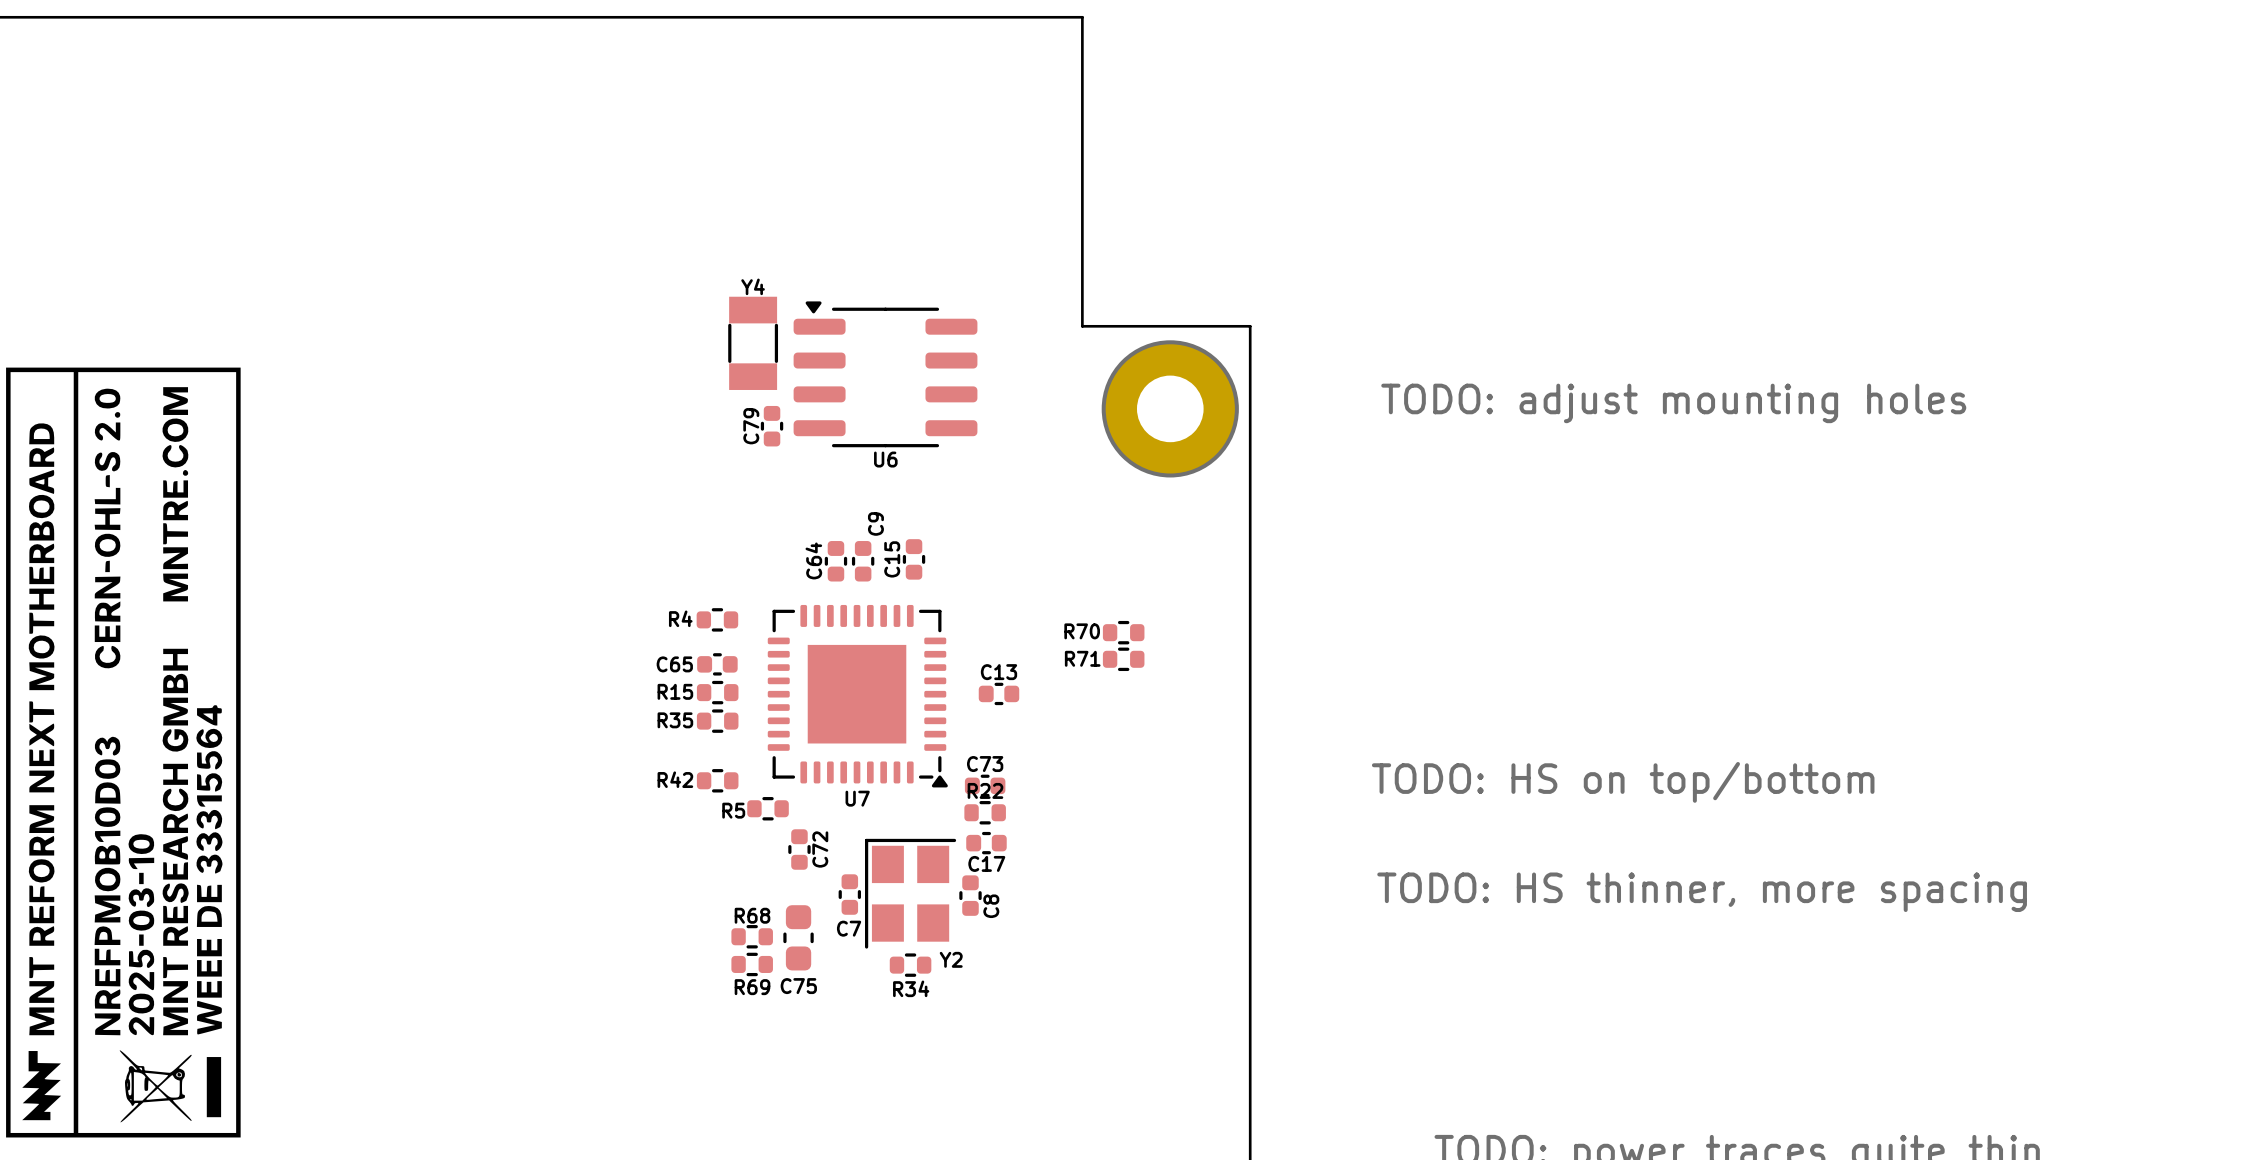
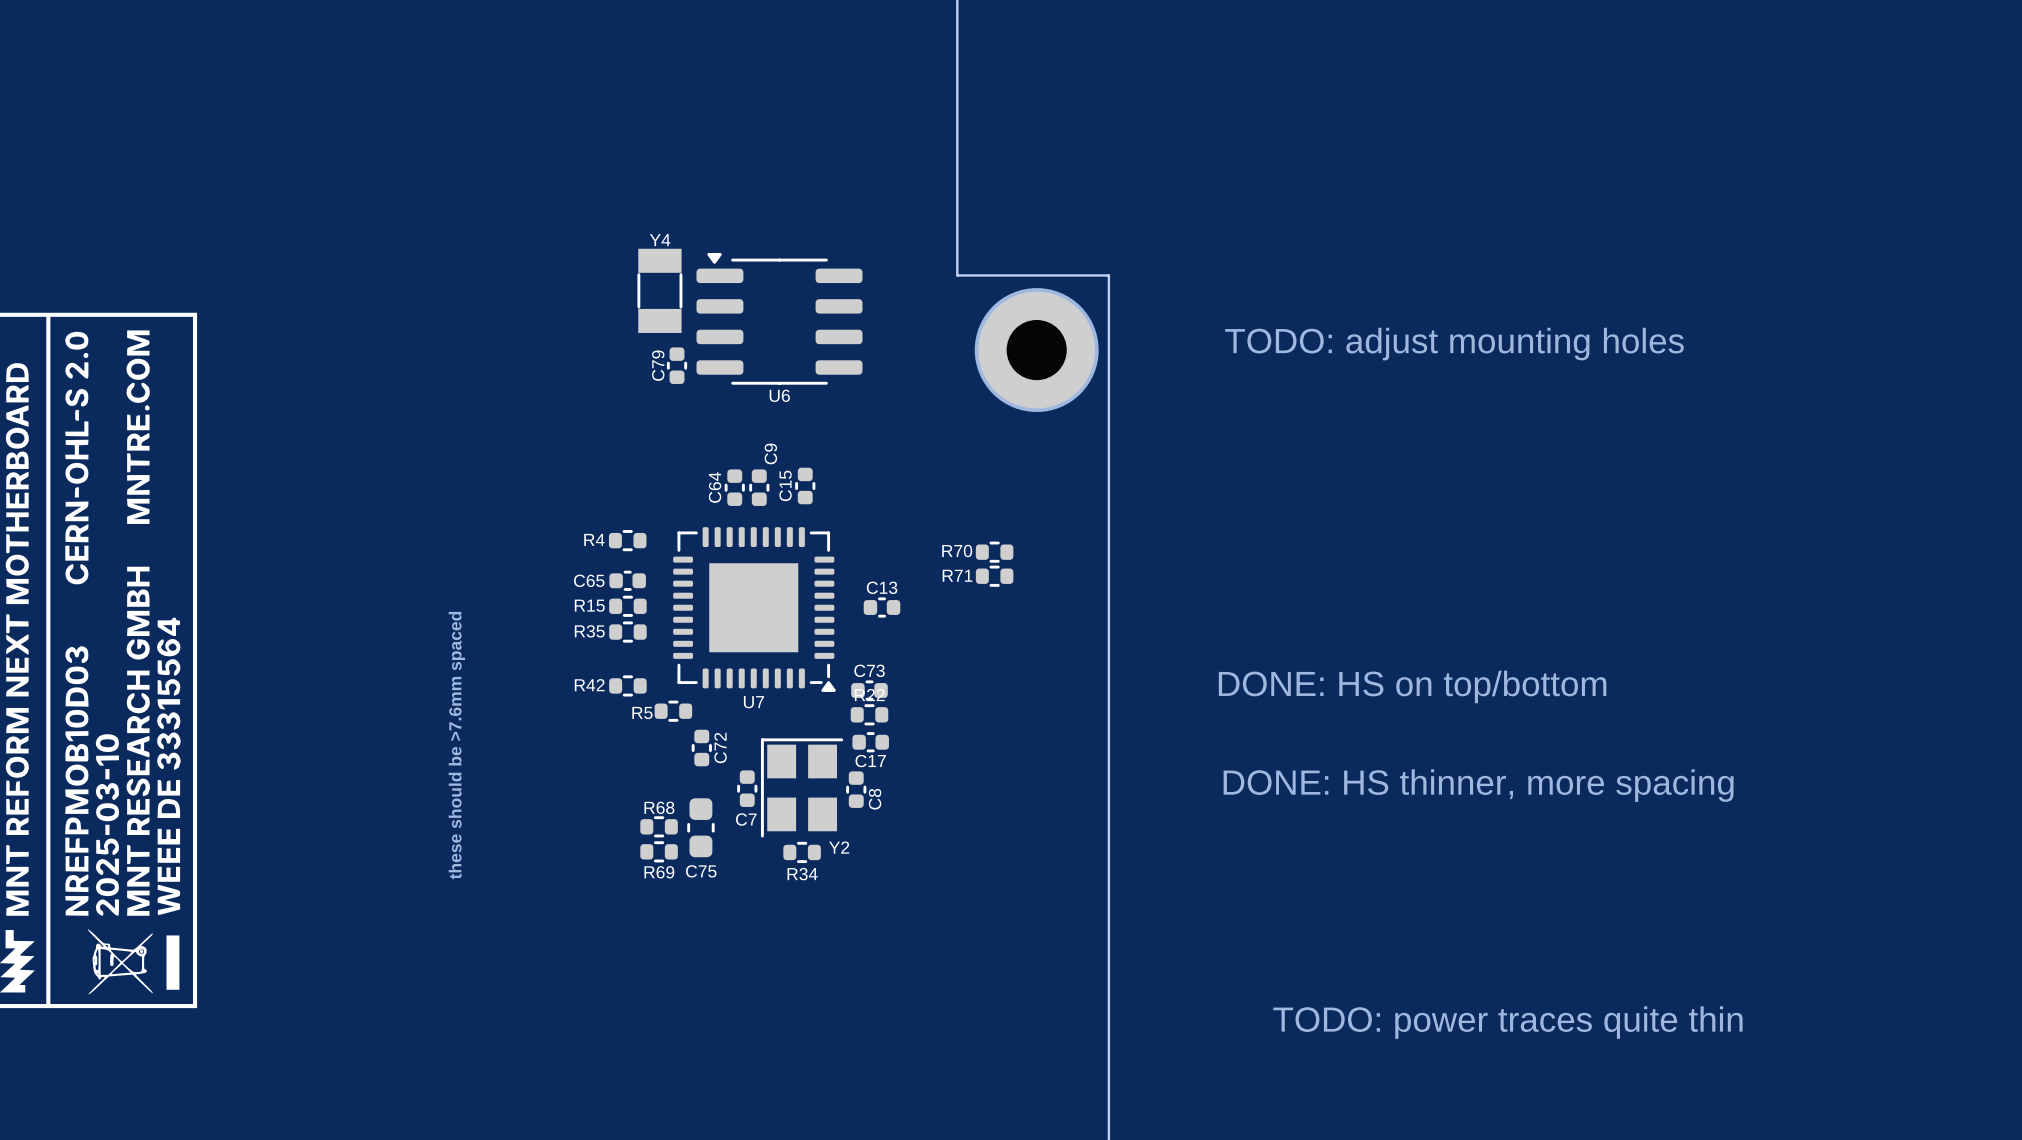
text: TODO: HS on top/bottom (1623, 782) -> DONE: HS on top/bottom (1412, 686)
text: none -> these should be >7.6mm spaced (456, 745)
text: TODO: HS thinner, more spacing (1702, 892) -> DONE: HS thinner, more spacing (1478, 785)

